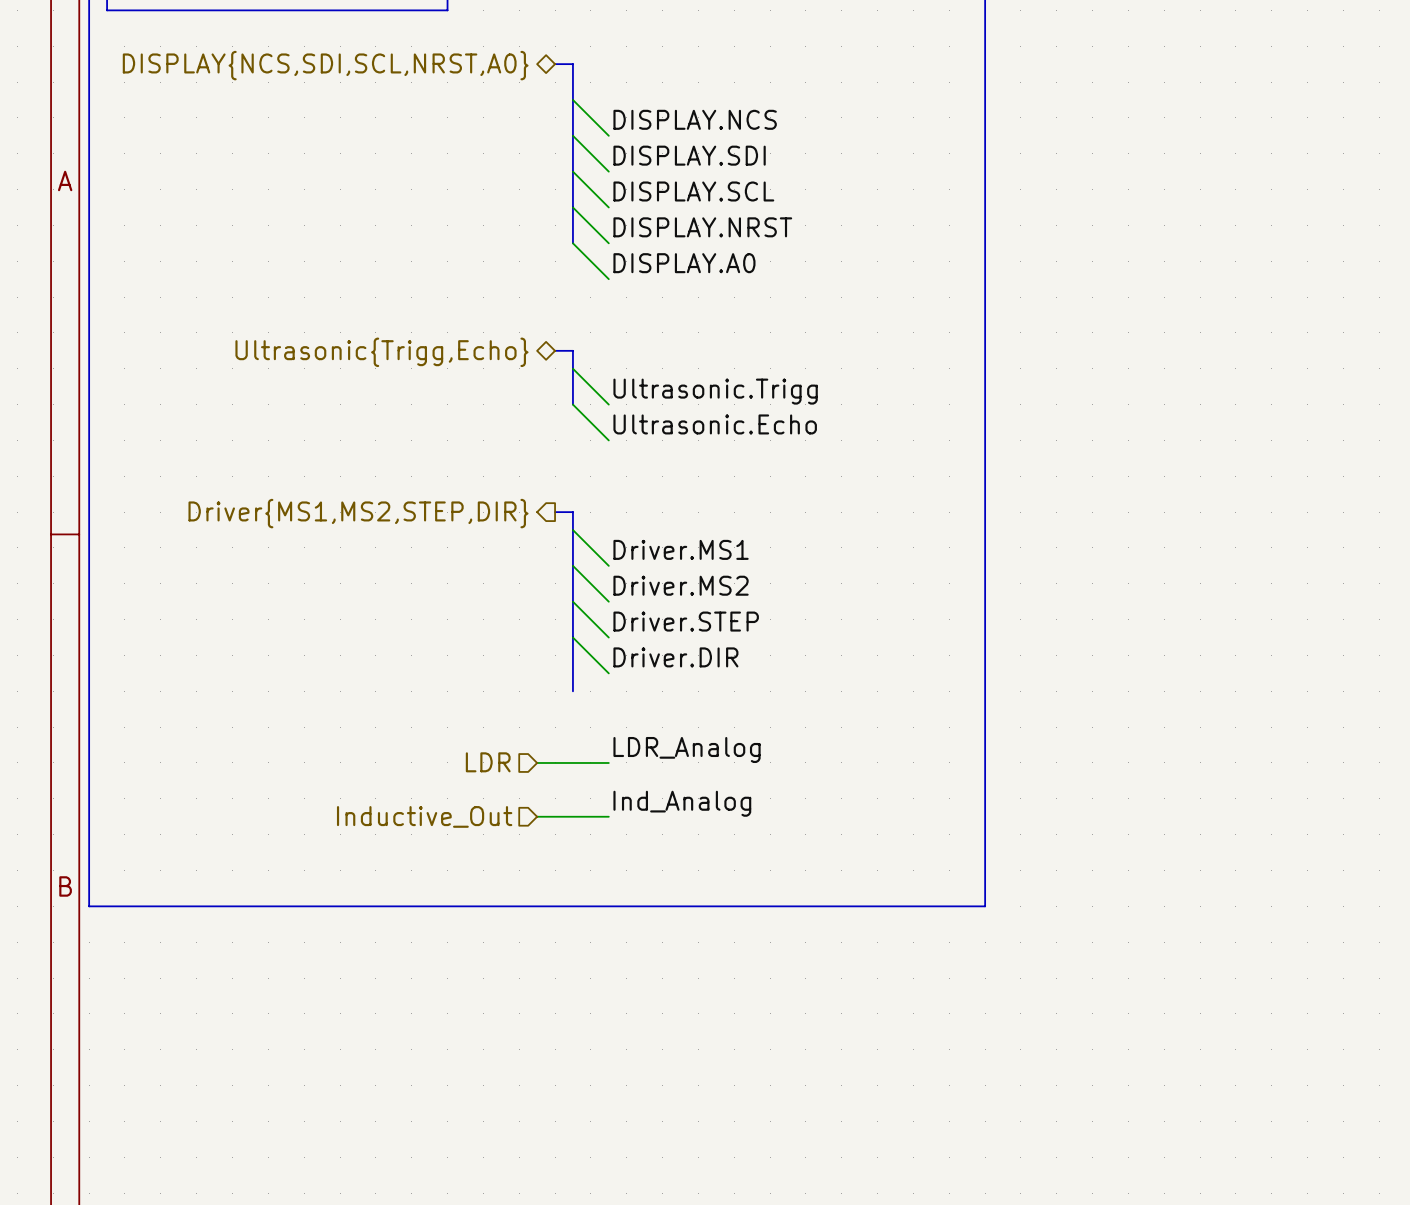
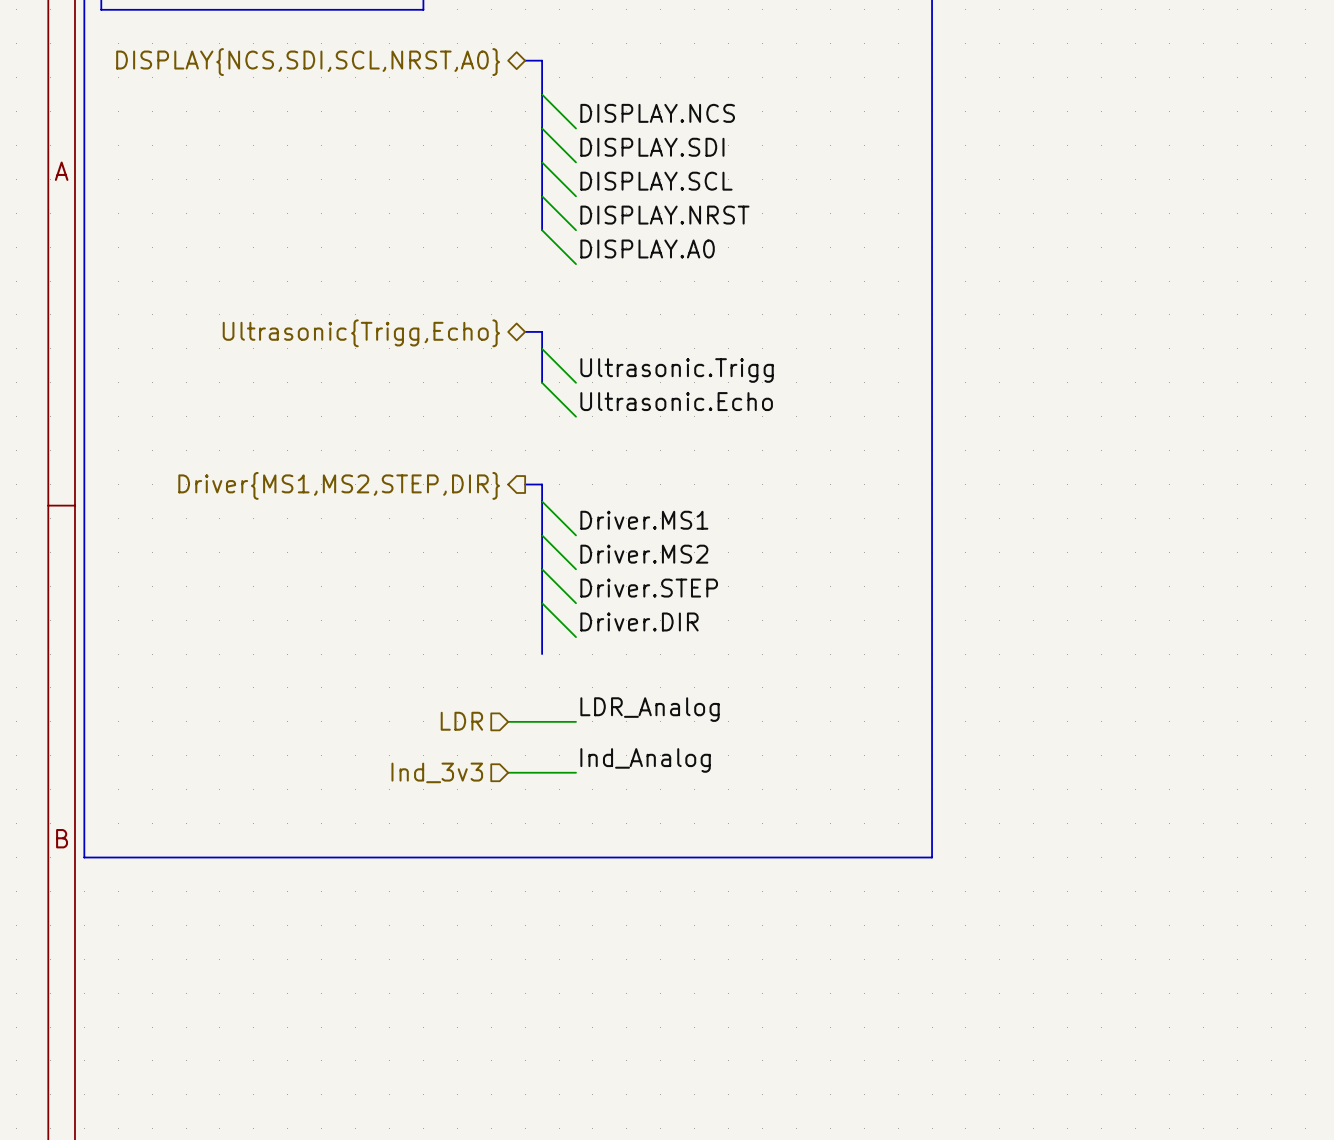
hierarchical label: Inductive_Out (424, 816) -> Ind_3v3 (437, 772)

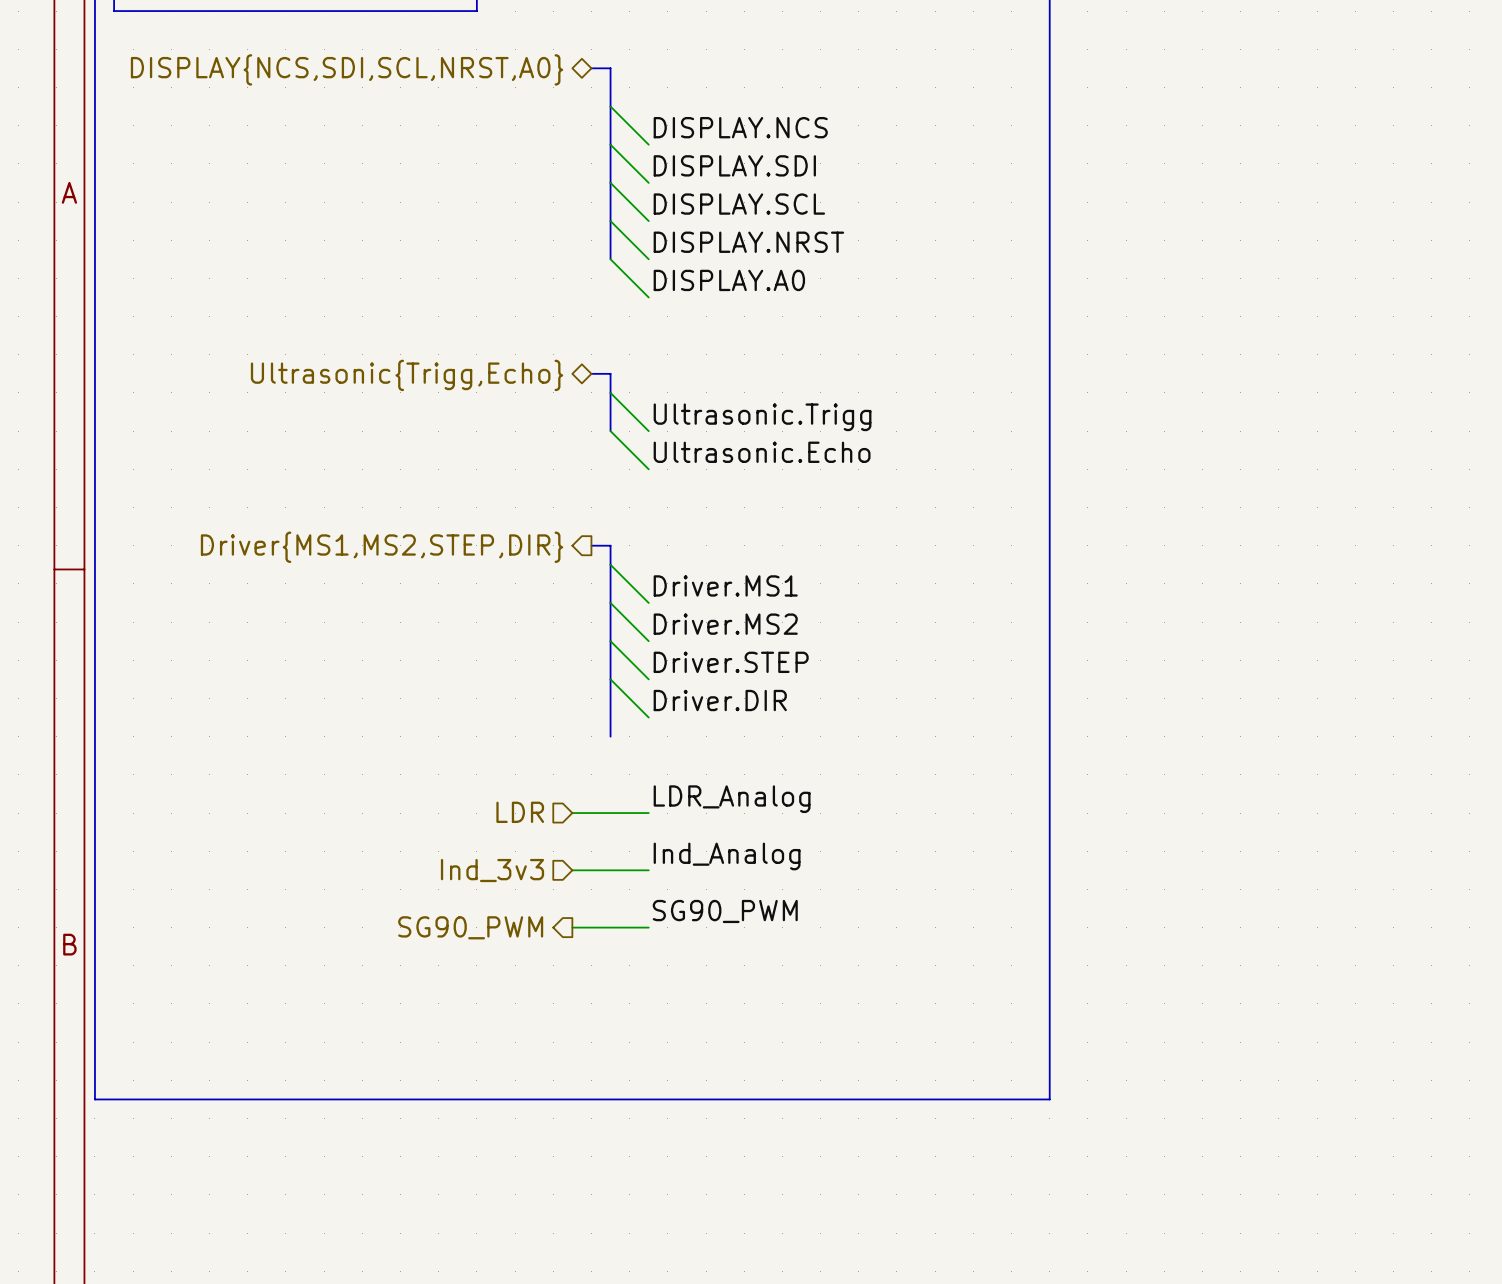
label: none -> SG90_PWM (725, 911)
hierarchical label: none -> SG90_PWM (470, 927)
wire: none -> (572, 927) (648, 927)
line: (84, 857) (932, 857) -> (94, 965) (94, 1099) (1049, 1099) (1049, 965)

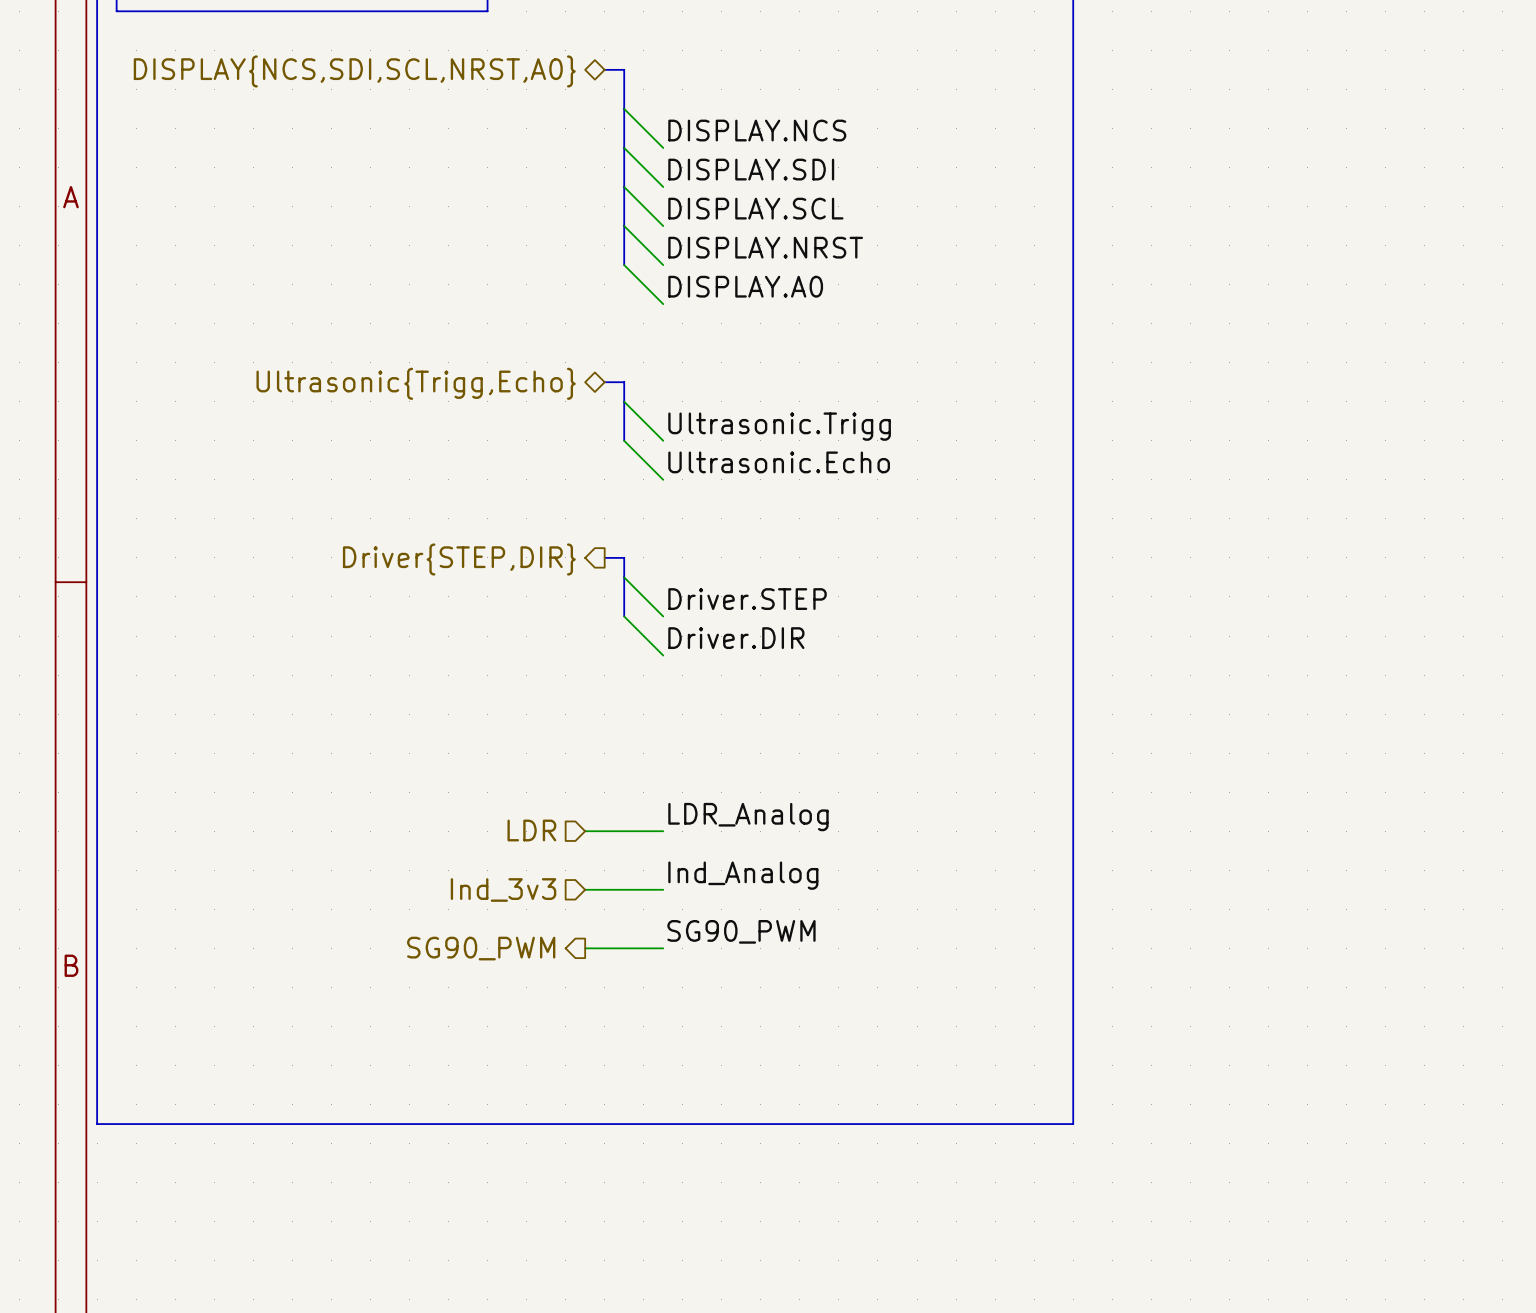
hierarchical label: Driver{MS1,MS2,STEP,DIR} (382, 547) -> Driver{STEP,DIR} (459, 559)
label: Driver.MS1 (725, 585) -> Driver.STEP (747, 599)
bus: (610, 602) (610, 736) -> none
label: Driver.MS2 (725, 624) -> Driver.DIR (736, 638)
wire: (610, 641) (648, 679) -> none
label: Driver.STEP (731, 662) -> none
wire: (610, 679) (648, 717) -> none
label: Driver.DIR (720, 700) -> none

